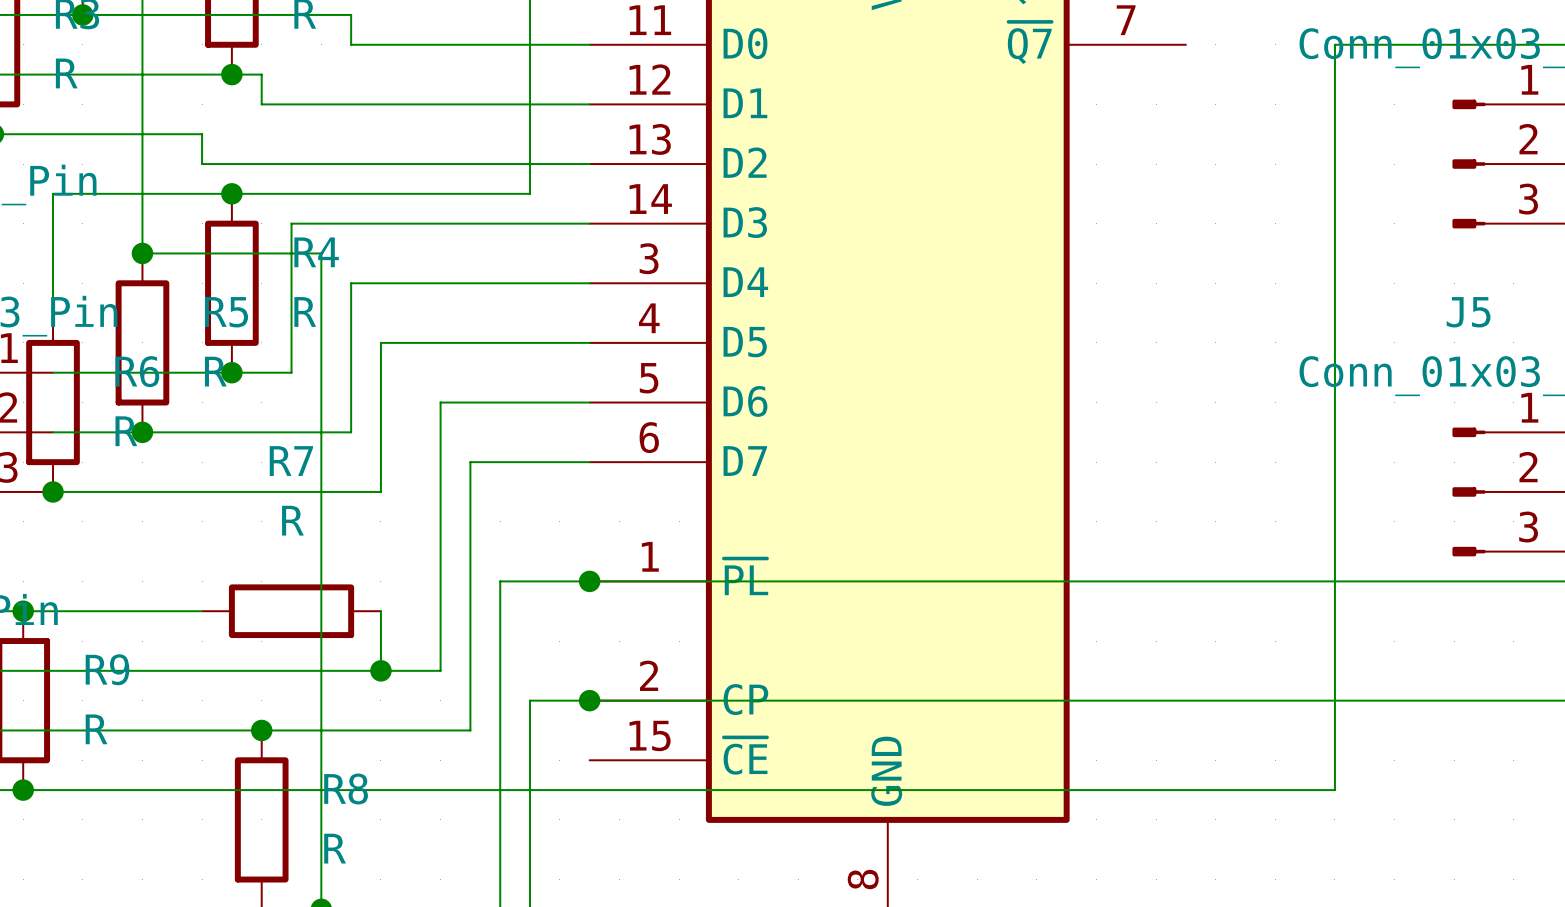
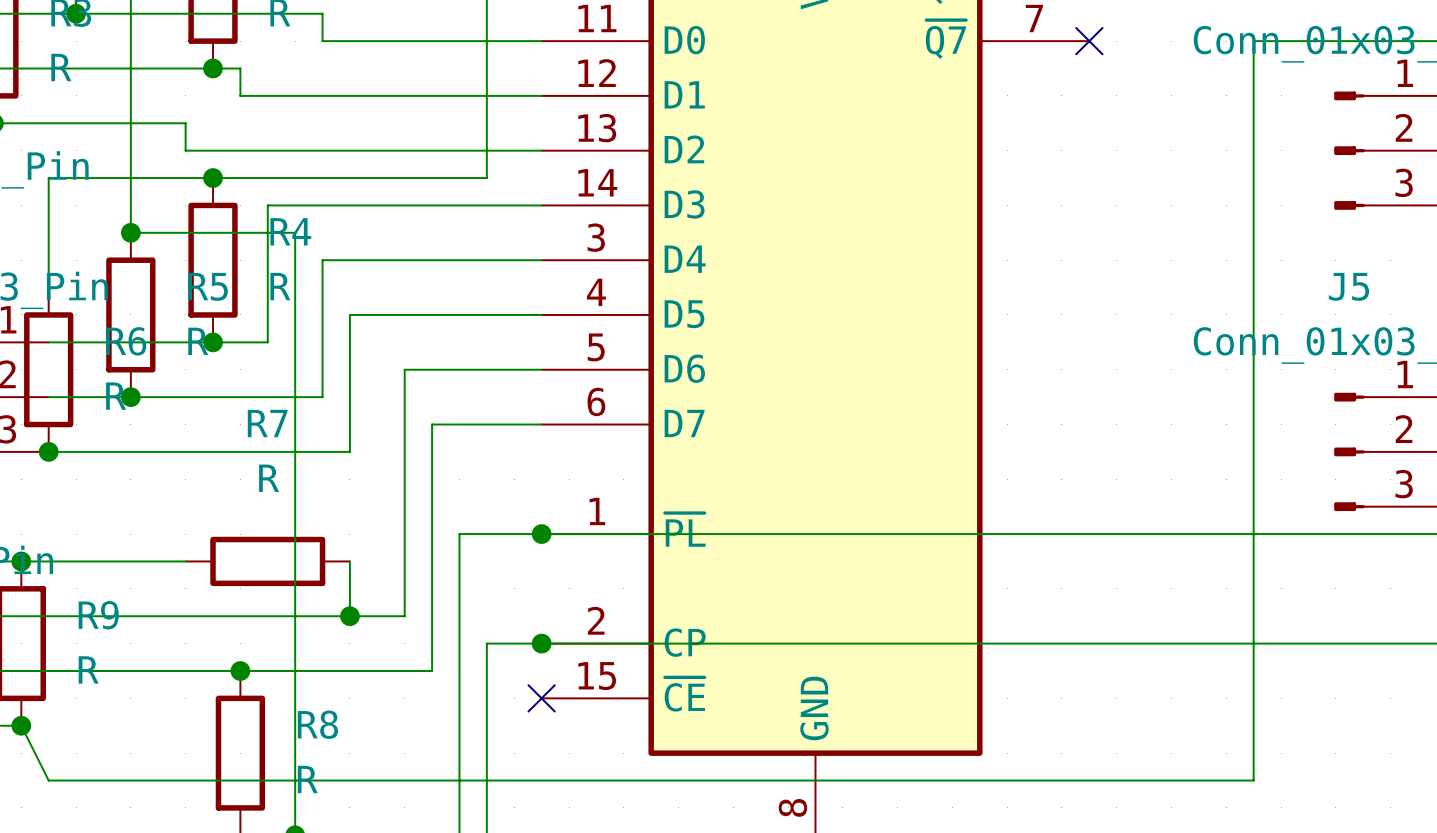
no-connect mark: none -> (1089, 41)
wire: (1364, 44) (1334, 44) (1334, 790) (23, 790) -> (1253, 41) (1253, 780) (48, 780) (21, 725)
no-connect mark: none -> (541, 698)

